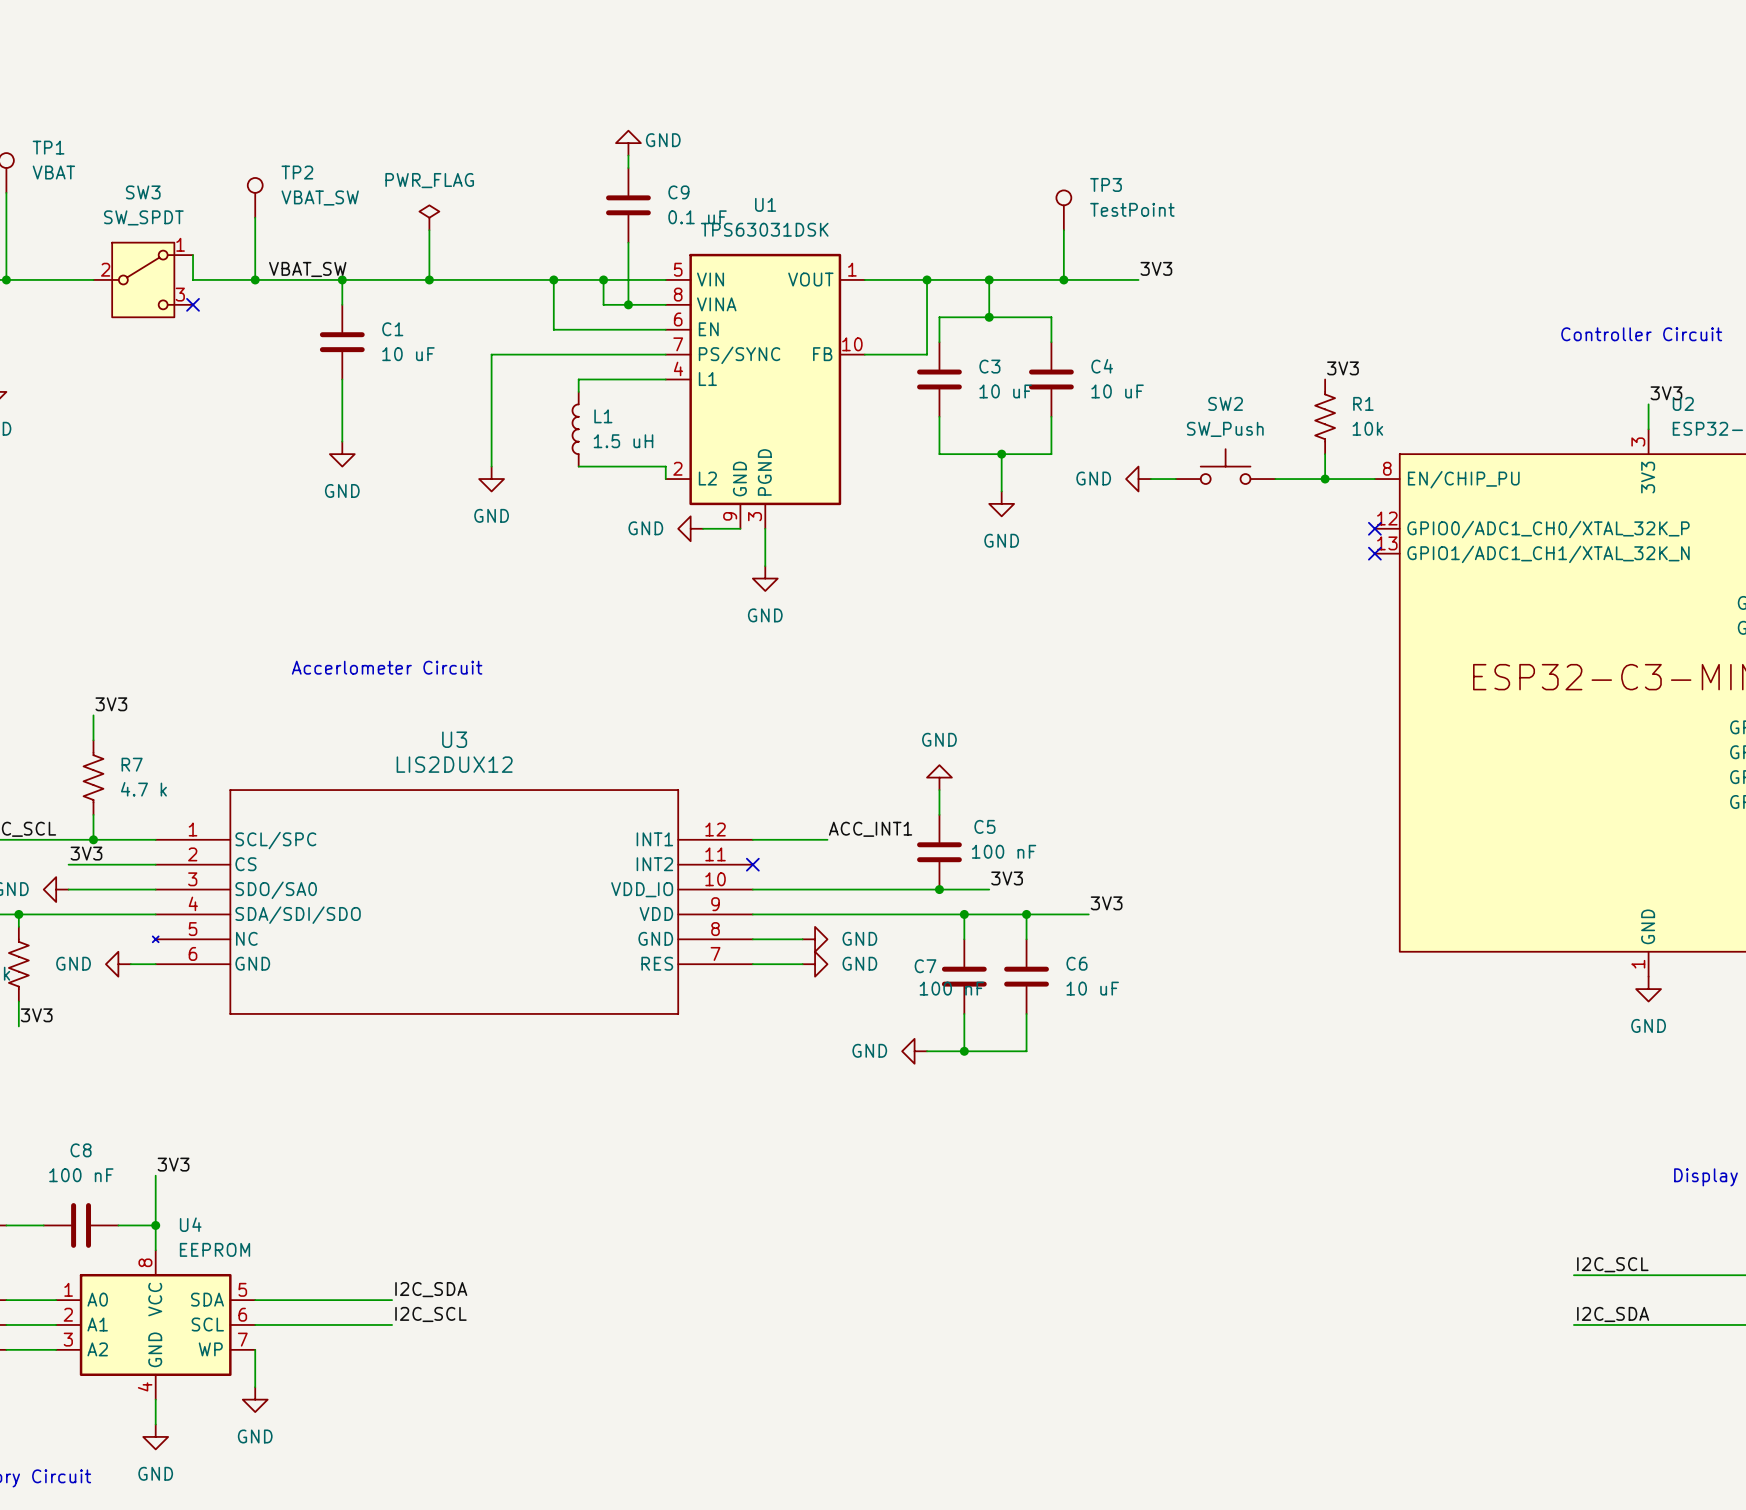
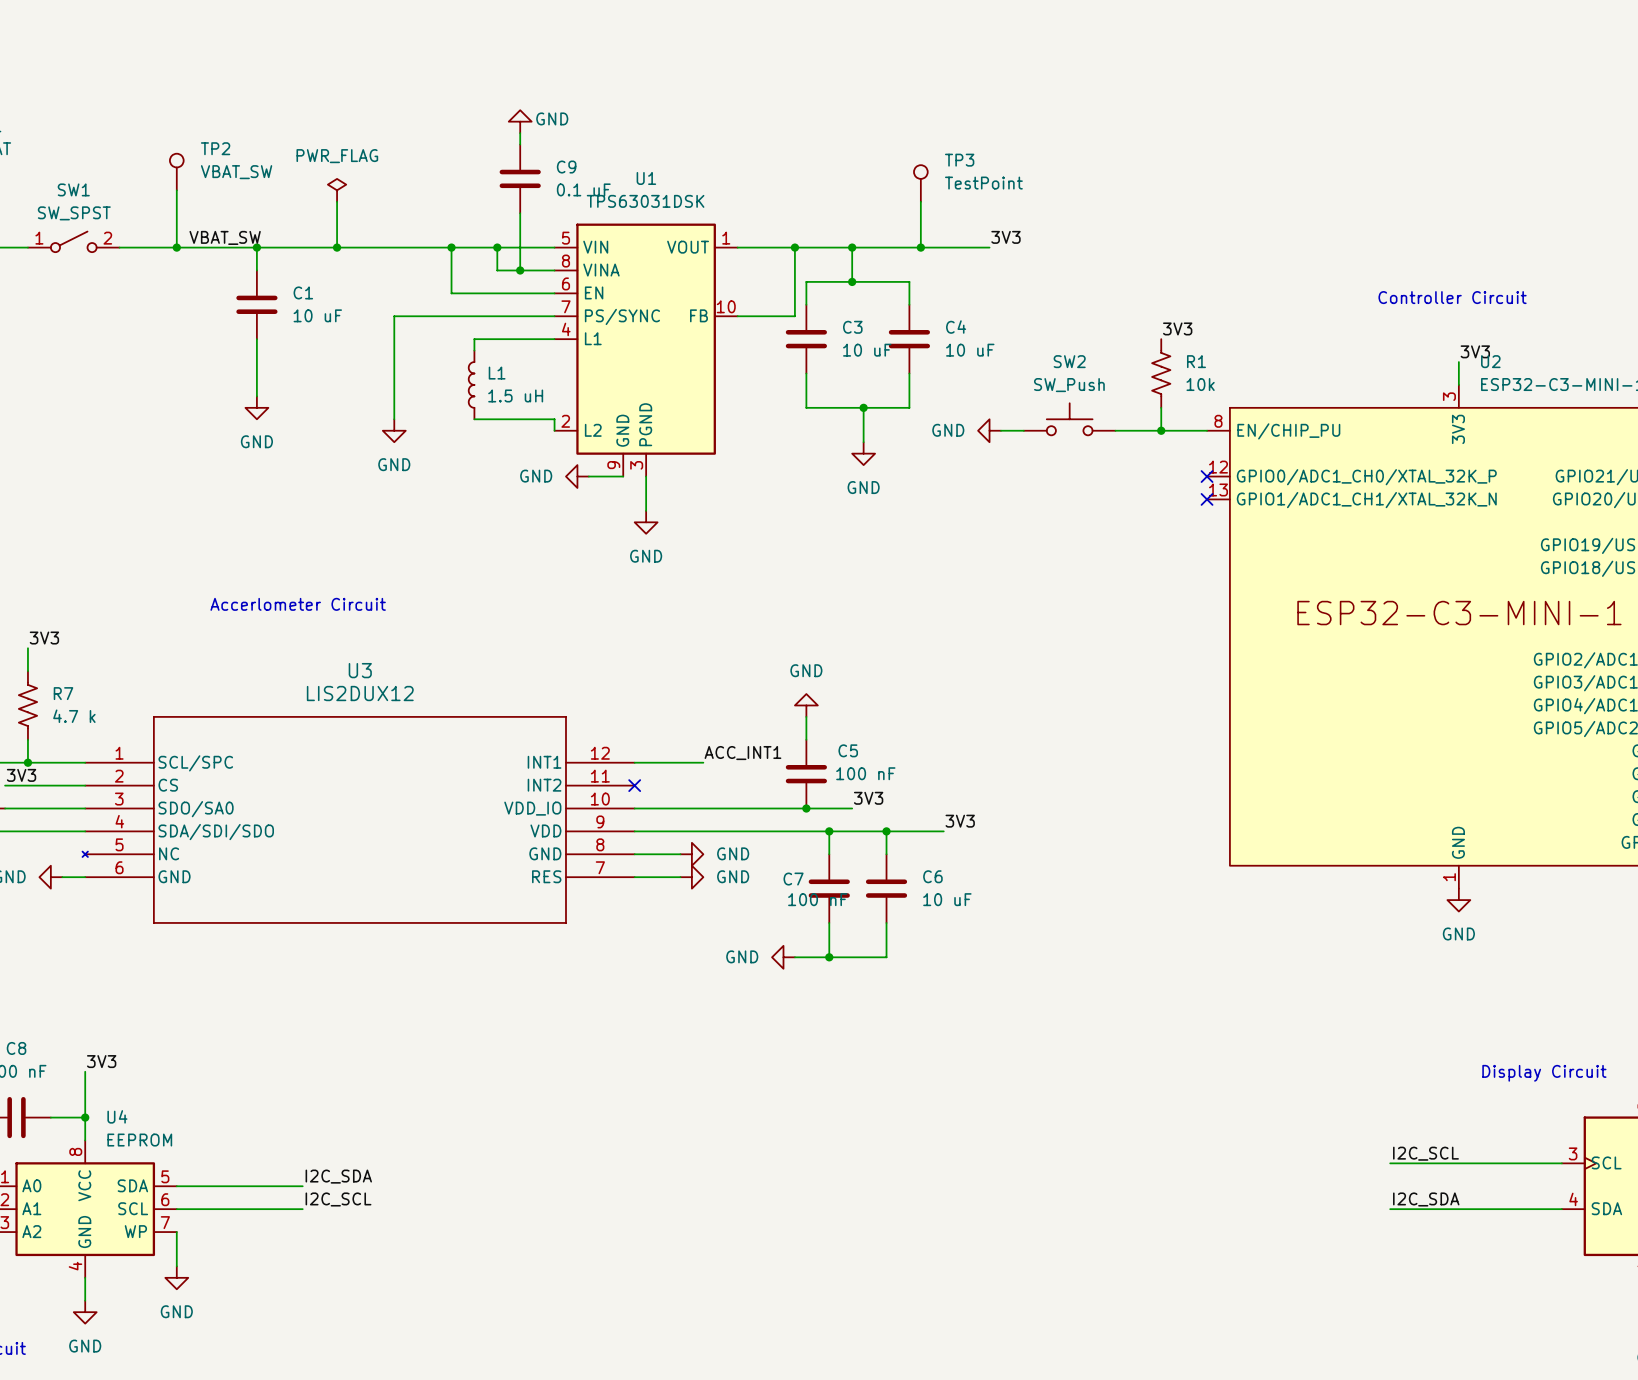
wire: (193, 255) (193, 279) -> none
SW1: none -> SW_SPST (73, 241)
SW3: SW_SPDT (143, 279) -> none
no-connect mark: (193, 304) -> none

